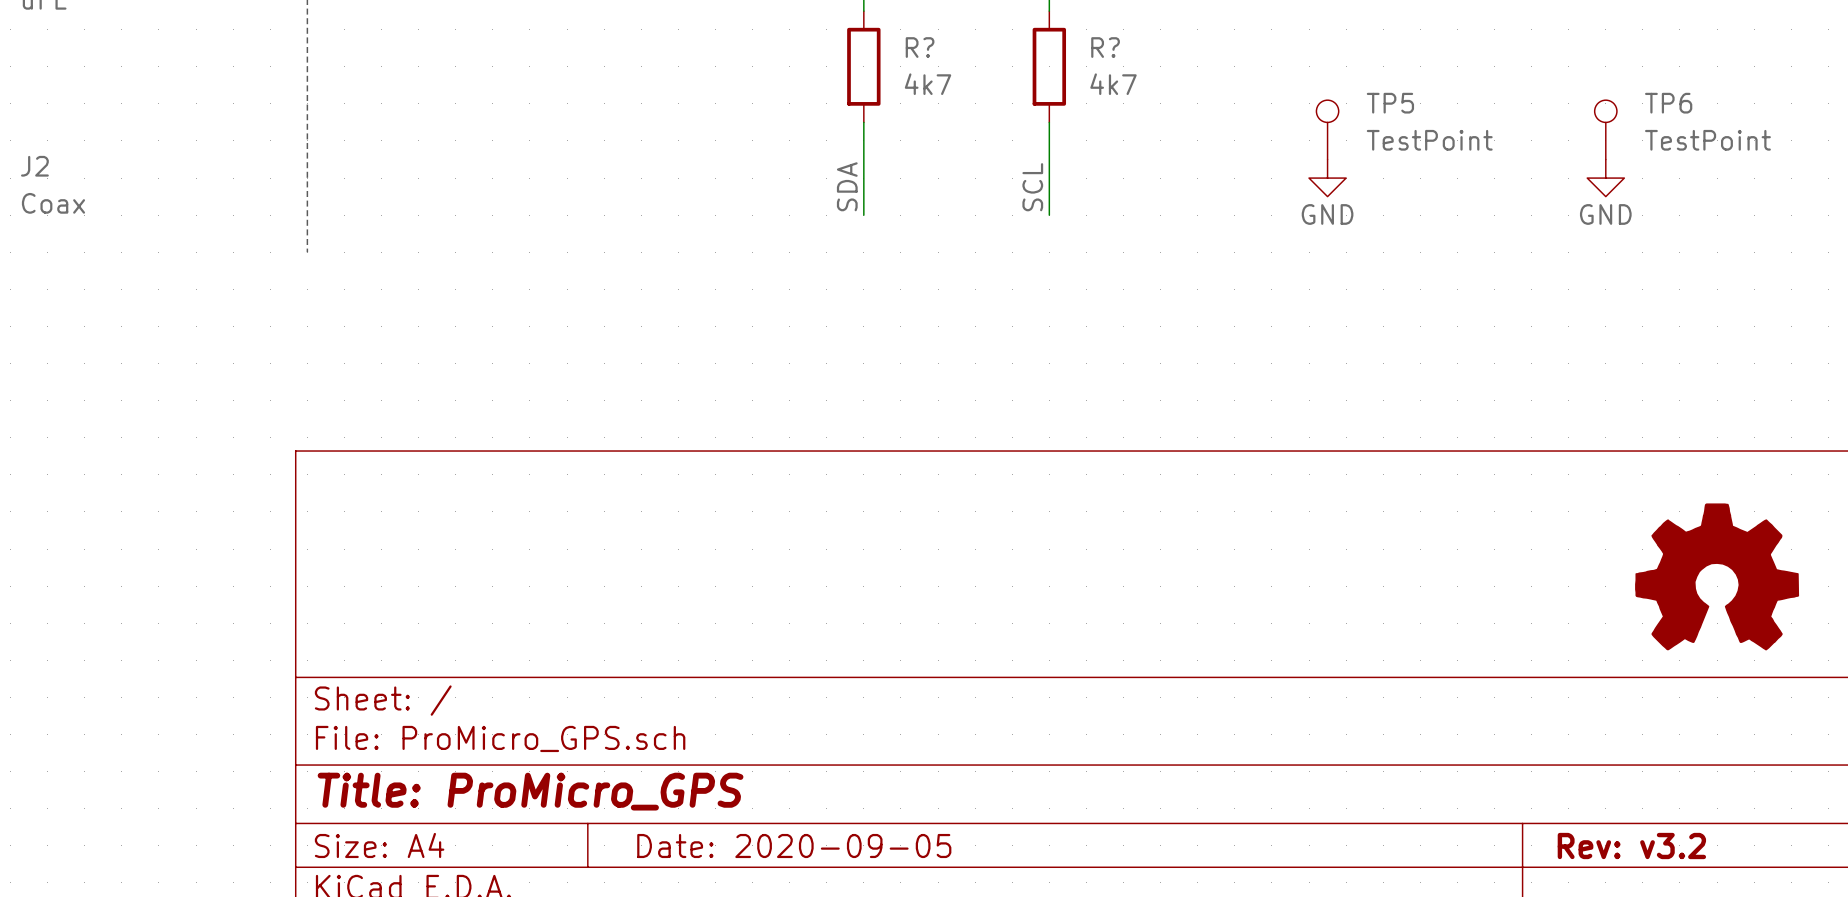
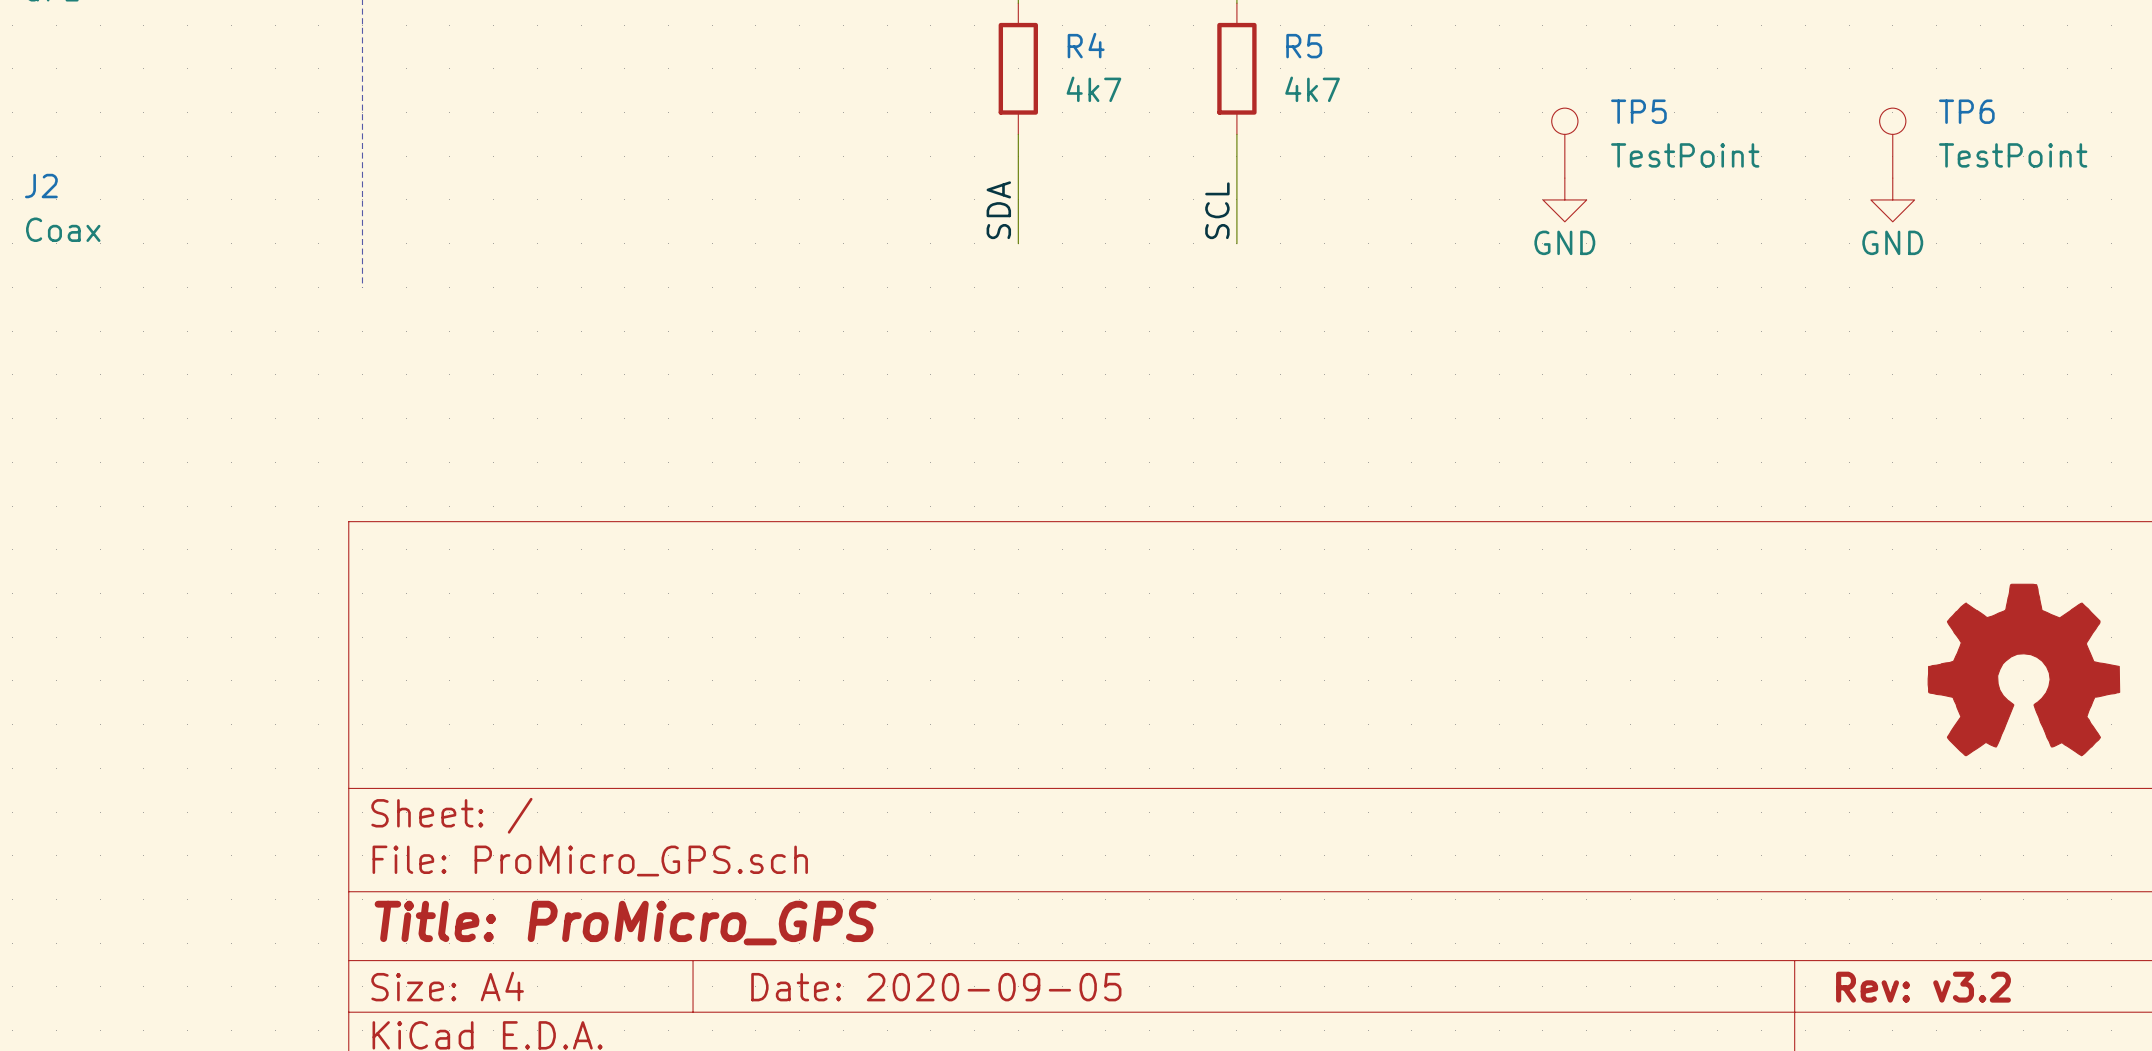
R? name: R? (920, 47) -> R4 (1086, 45)
R? name: R? (1105, 47) -> R5 (1304, 46)

